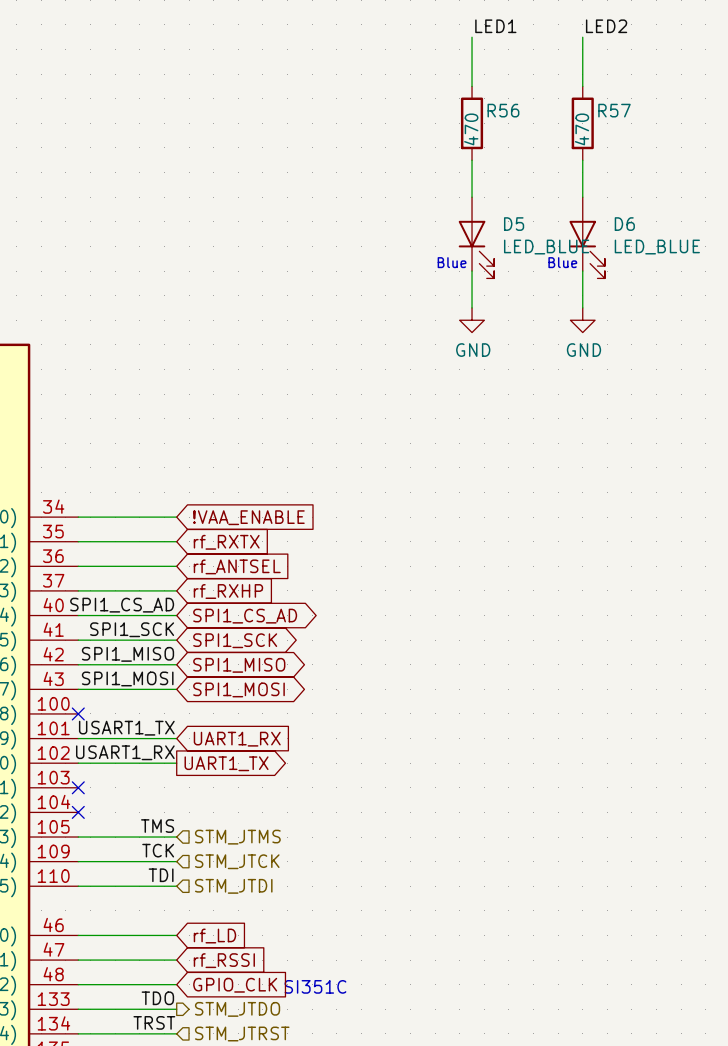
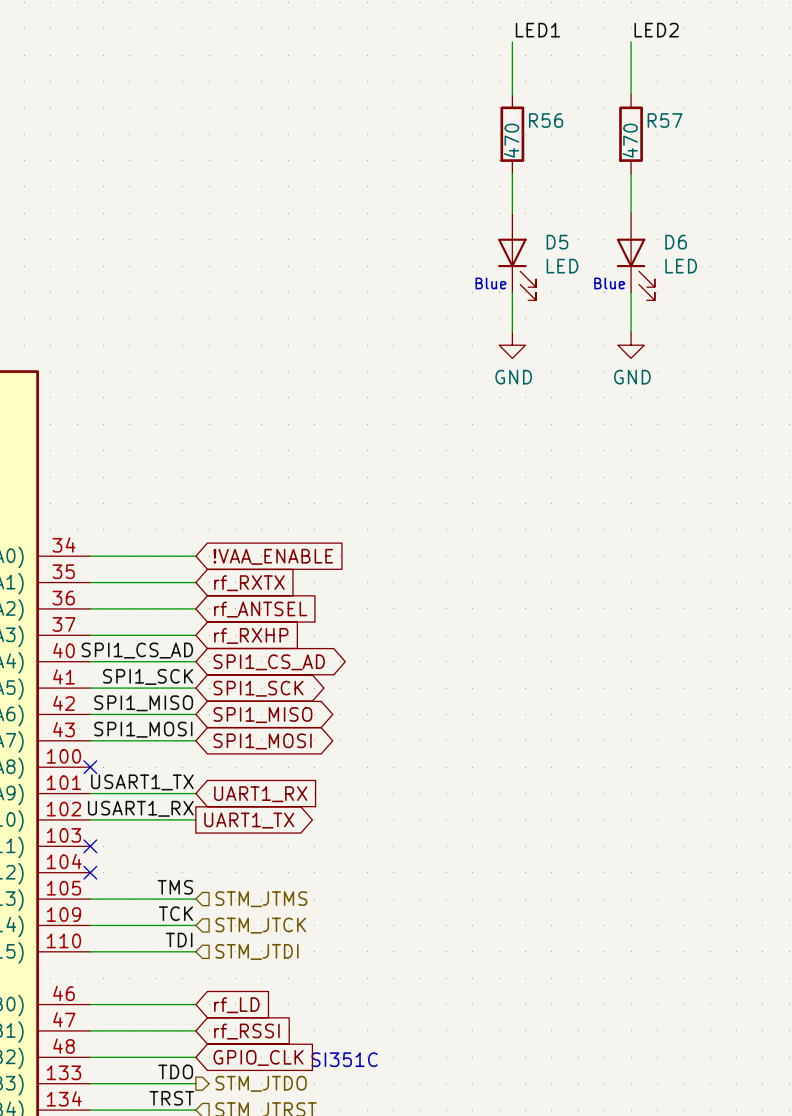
D5 value: LED_BLUE (546, 247) -> LED (562, 266)
D6 value: LED_BLUE (657, 247) -> LED (681, 266)

